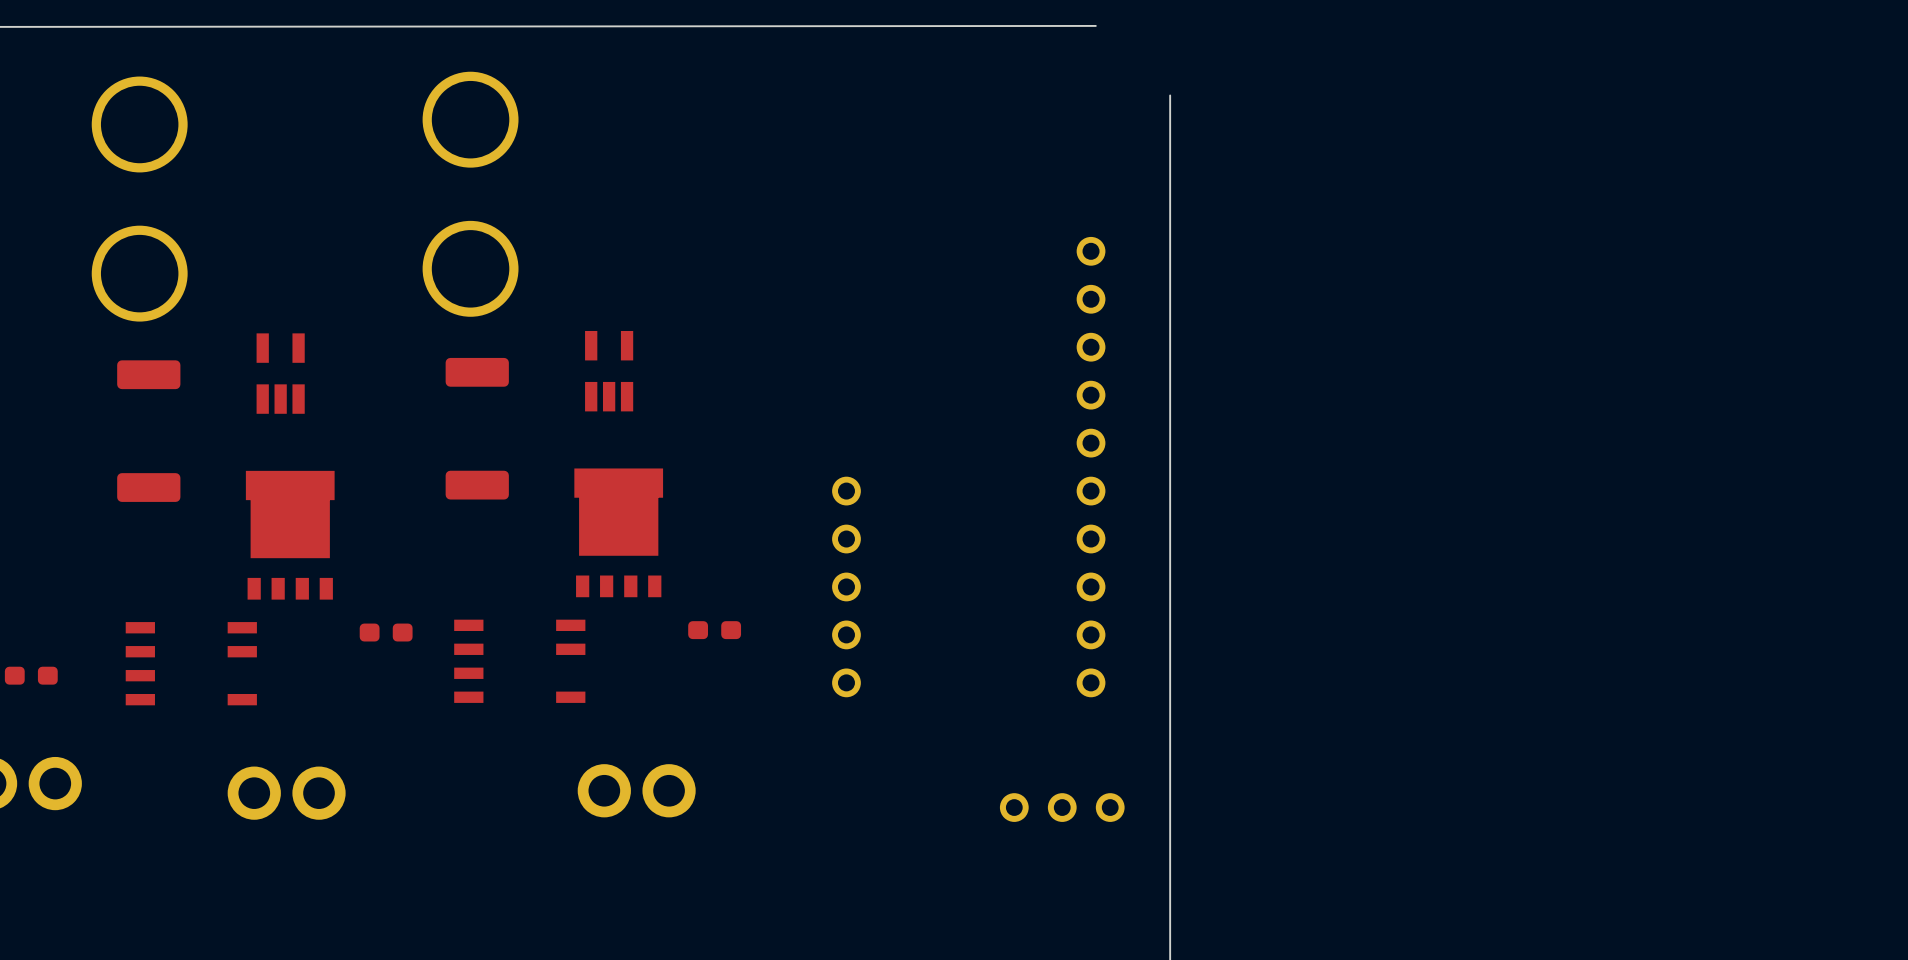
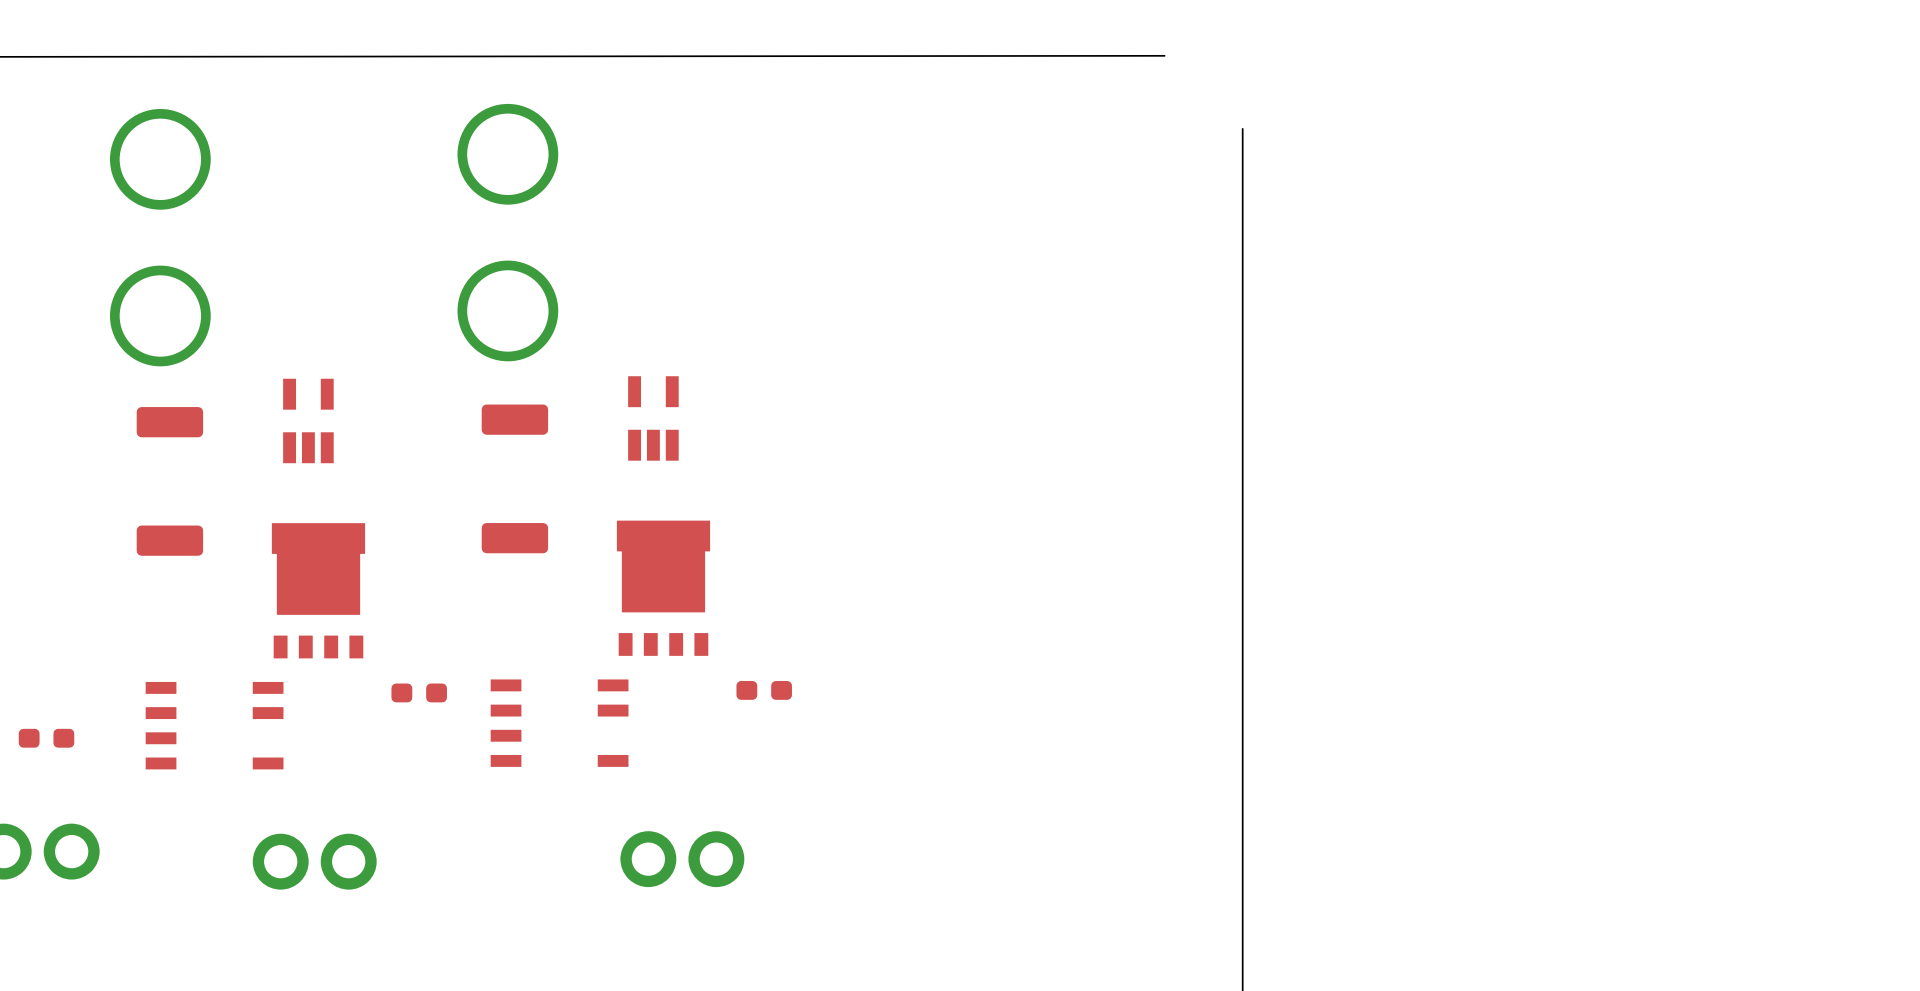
part: (1091, 467) -> none
part: (846, 586) -> none
part: (1062, 807) -> none

